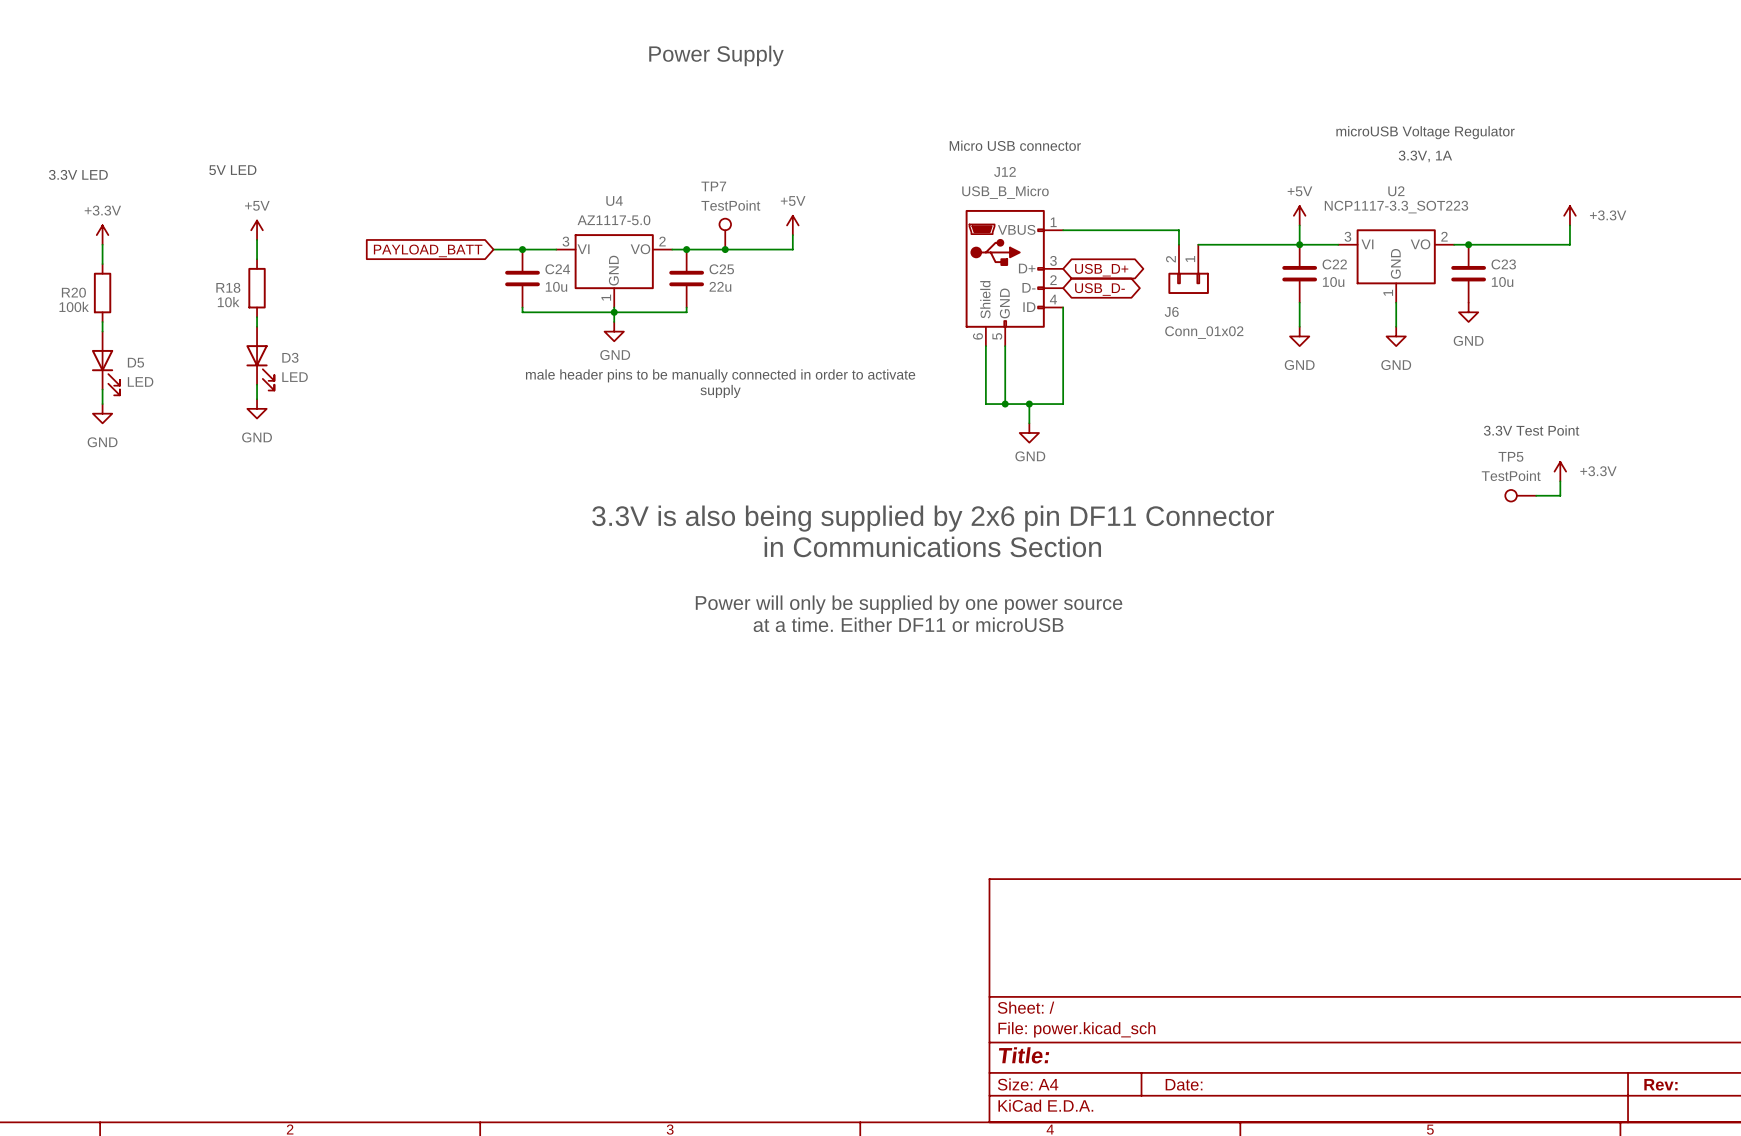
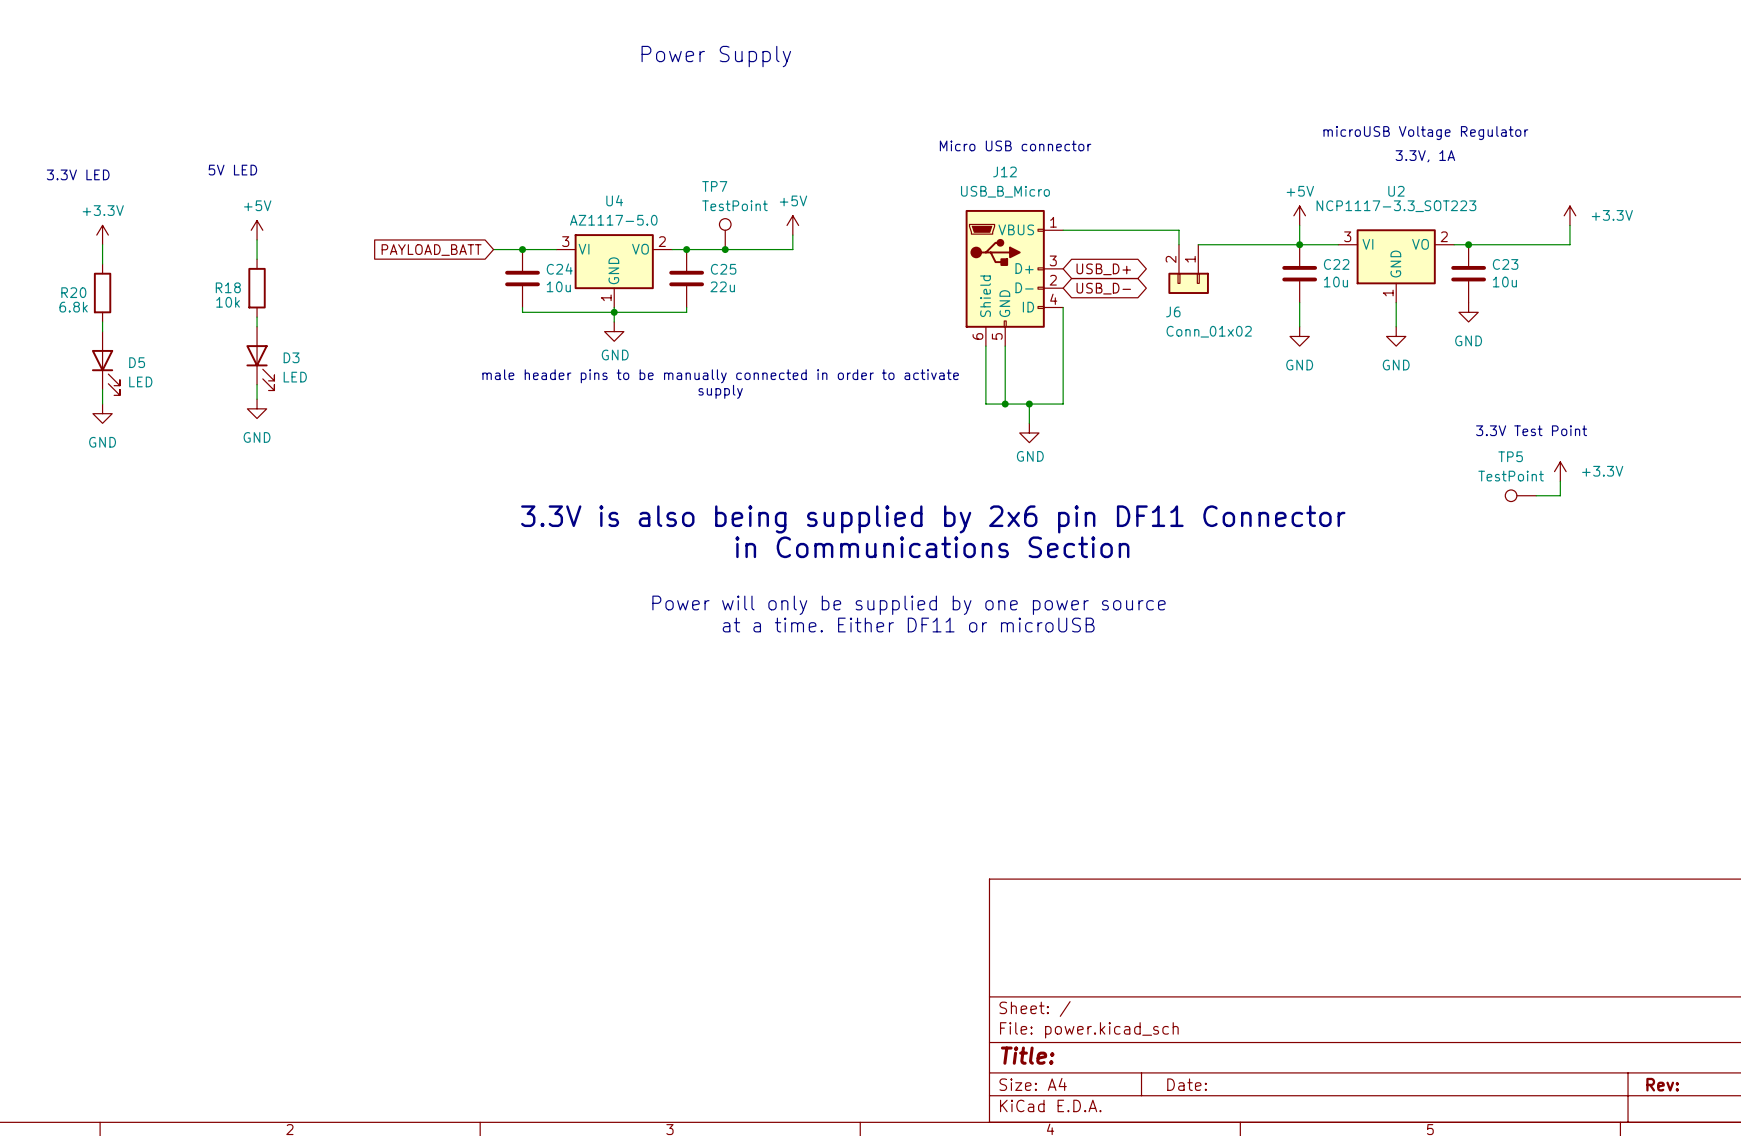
R20 value: 100k (74, 306) -> 6.8k (73, 307)

